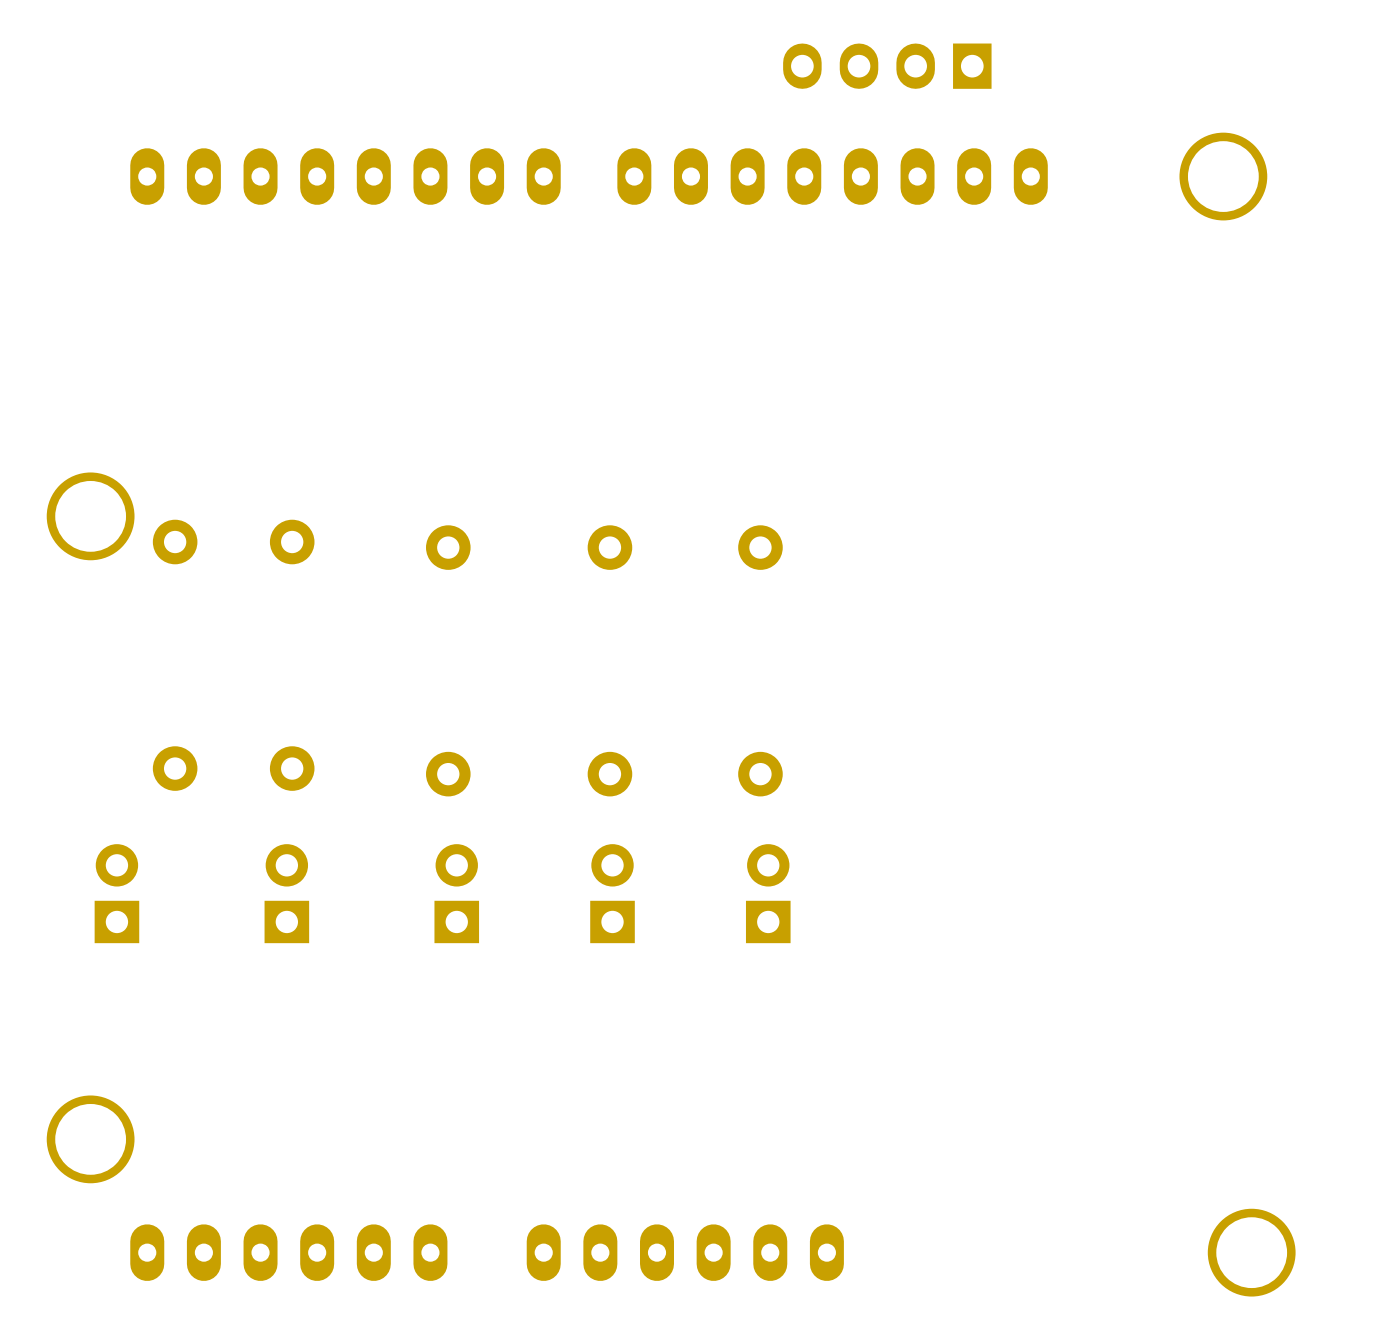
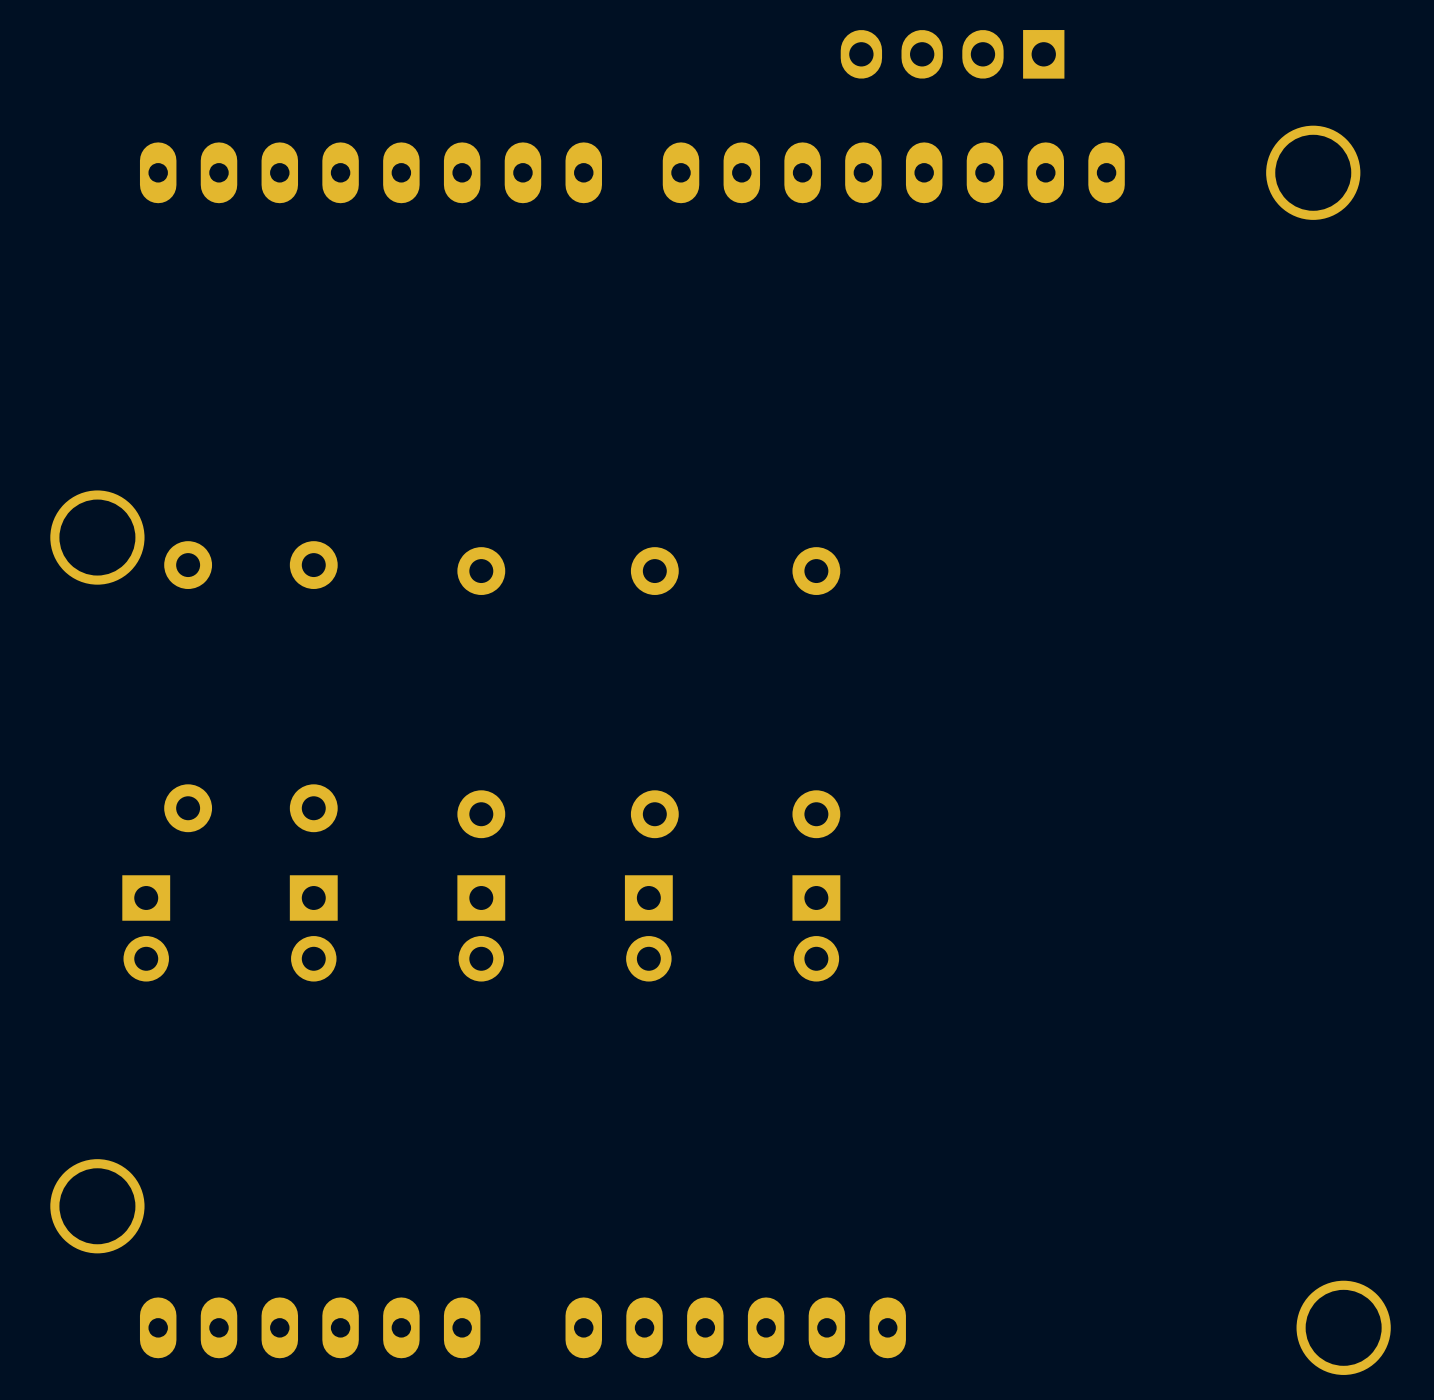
part rotation: 0° (116, 893) -> 180° (146, 928)
part rotation: 0° (286, 893) -> 180° (313, 928)
part rotation: 0° (456, 893) -> 180° (481, 928)
part rotation: 0° (612, 893) -> 180° (648, 928)
part rotation: 0° (768, 893) -> 180° (816, 928)

